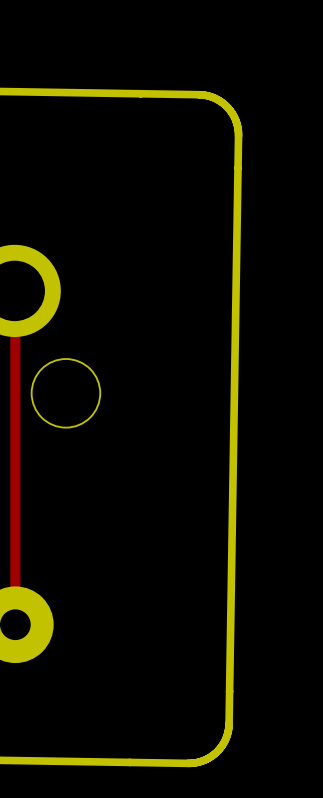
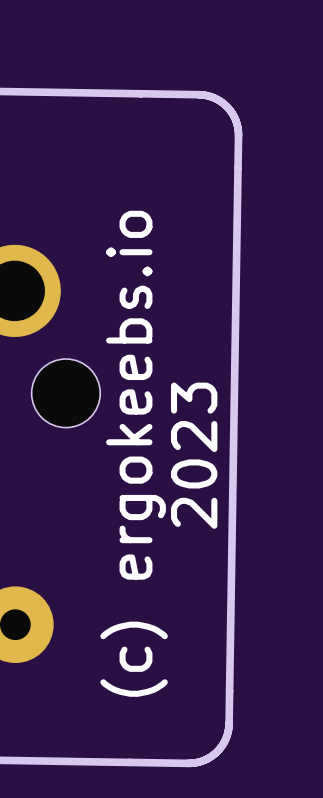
track: (14, 290) (15, 624) -> none
text: none -> (c) ergokeebs.io (134, 453)
text: none -> 2023 (194, 455)

